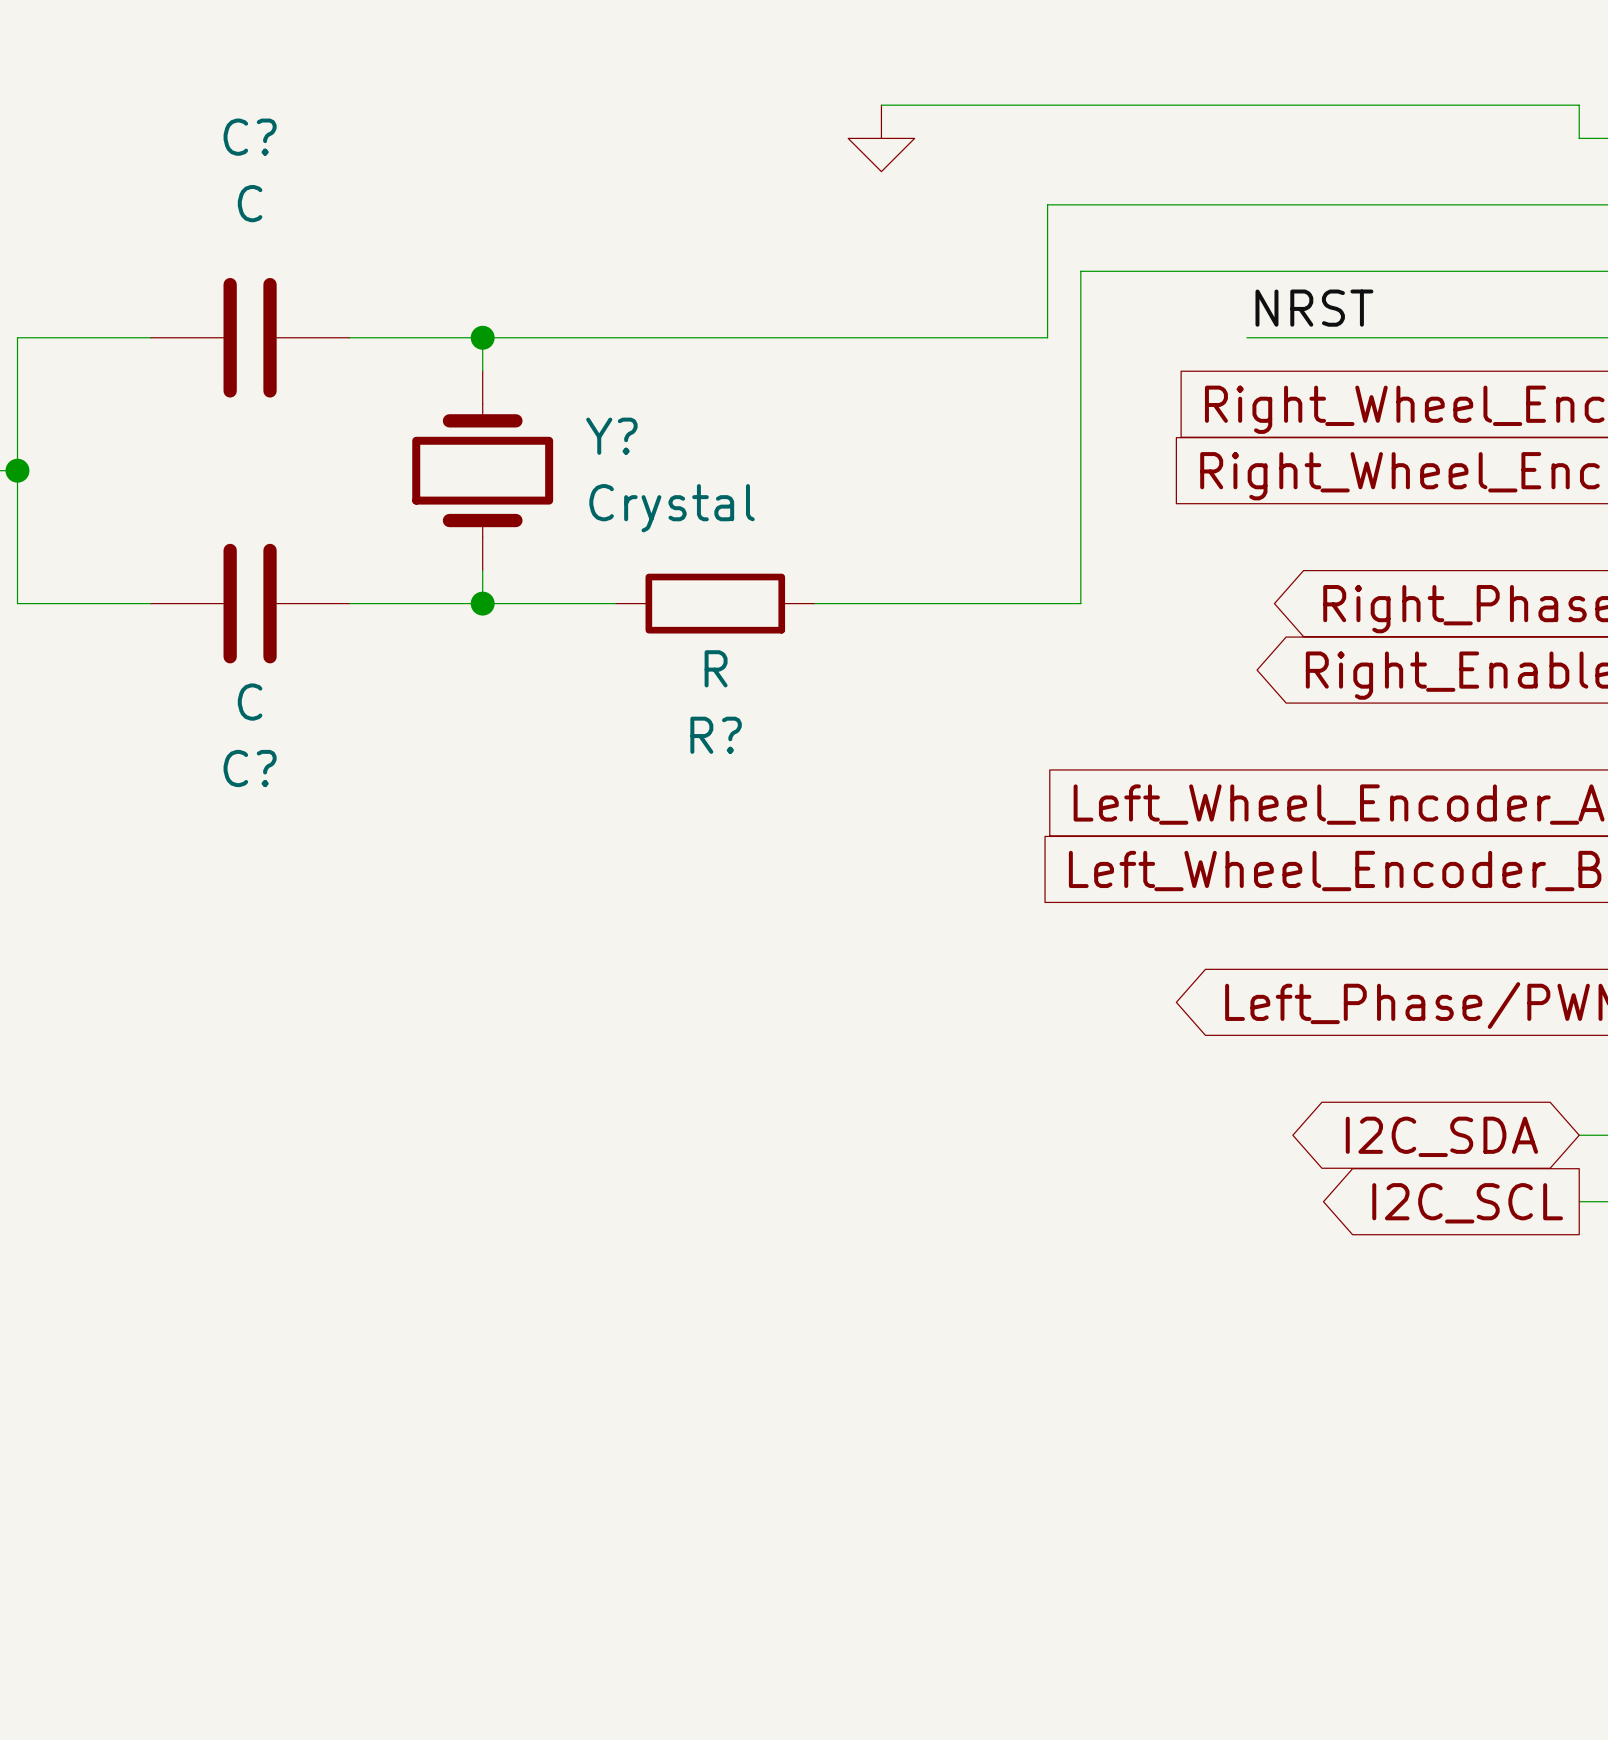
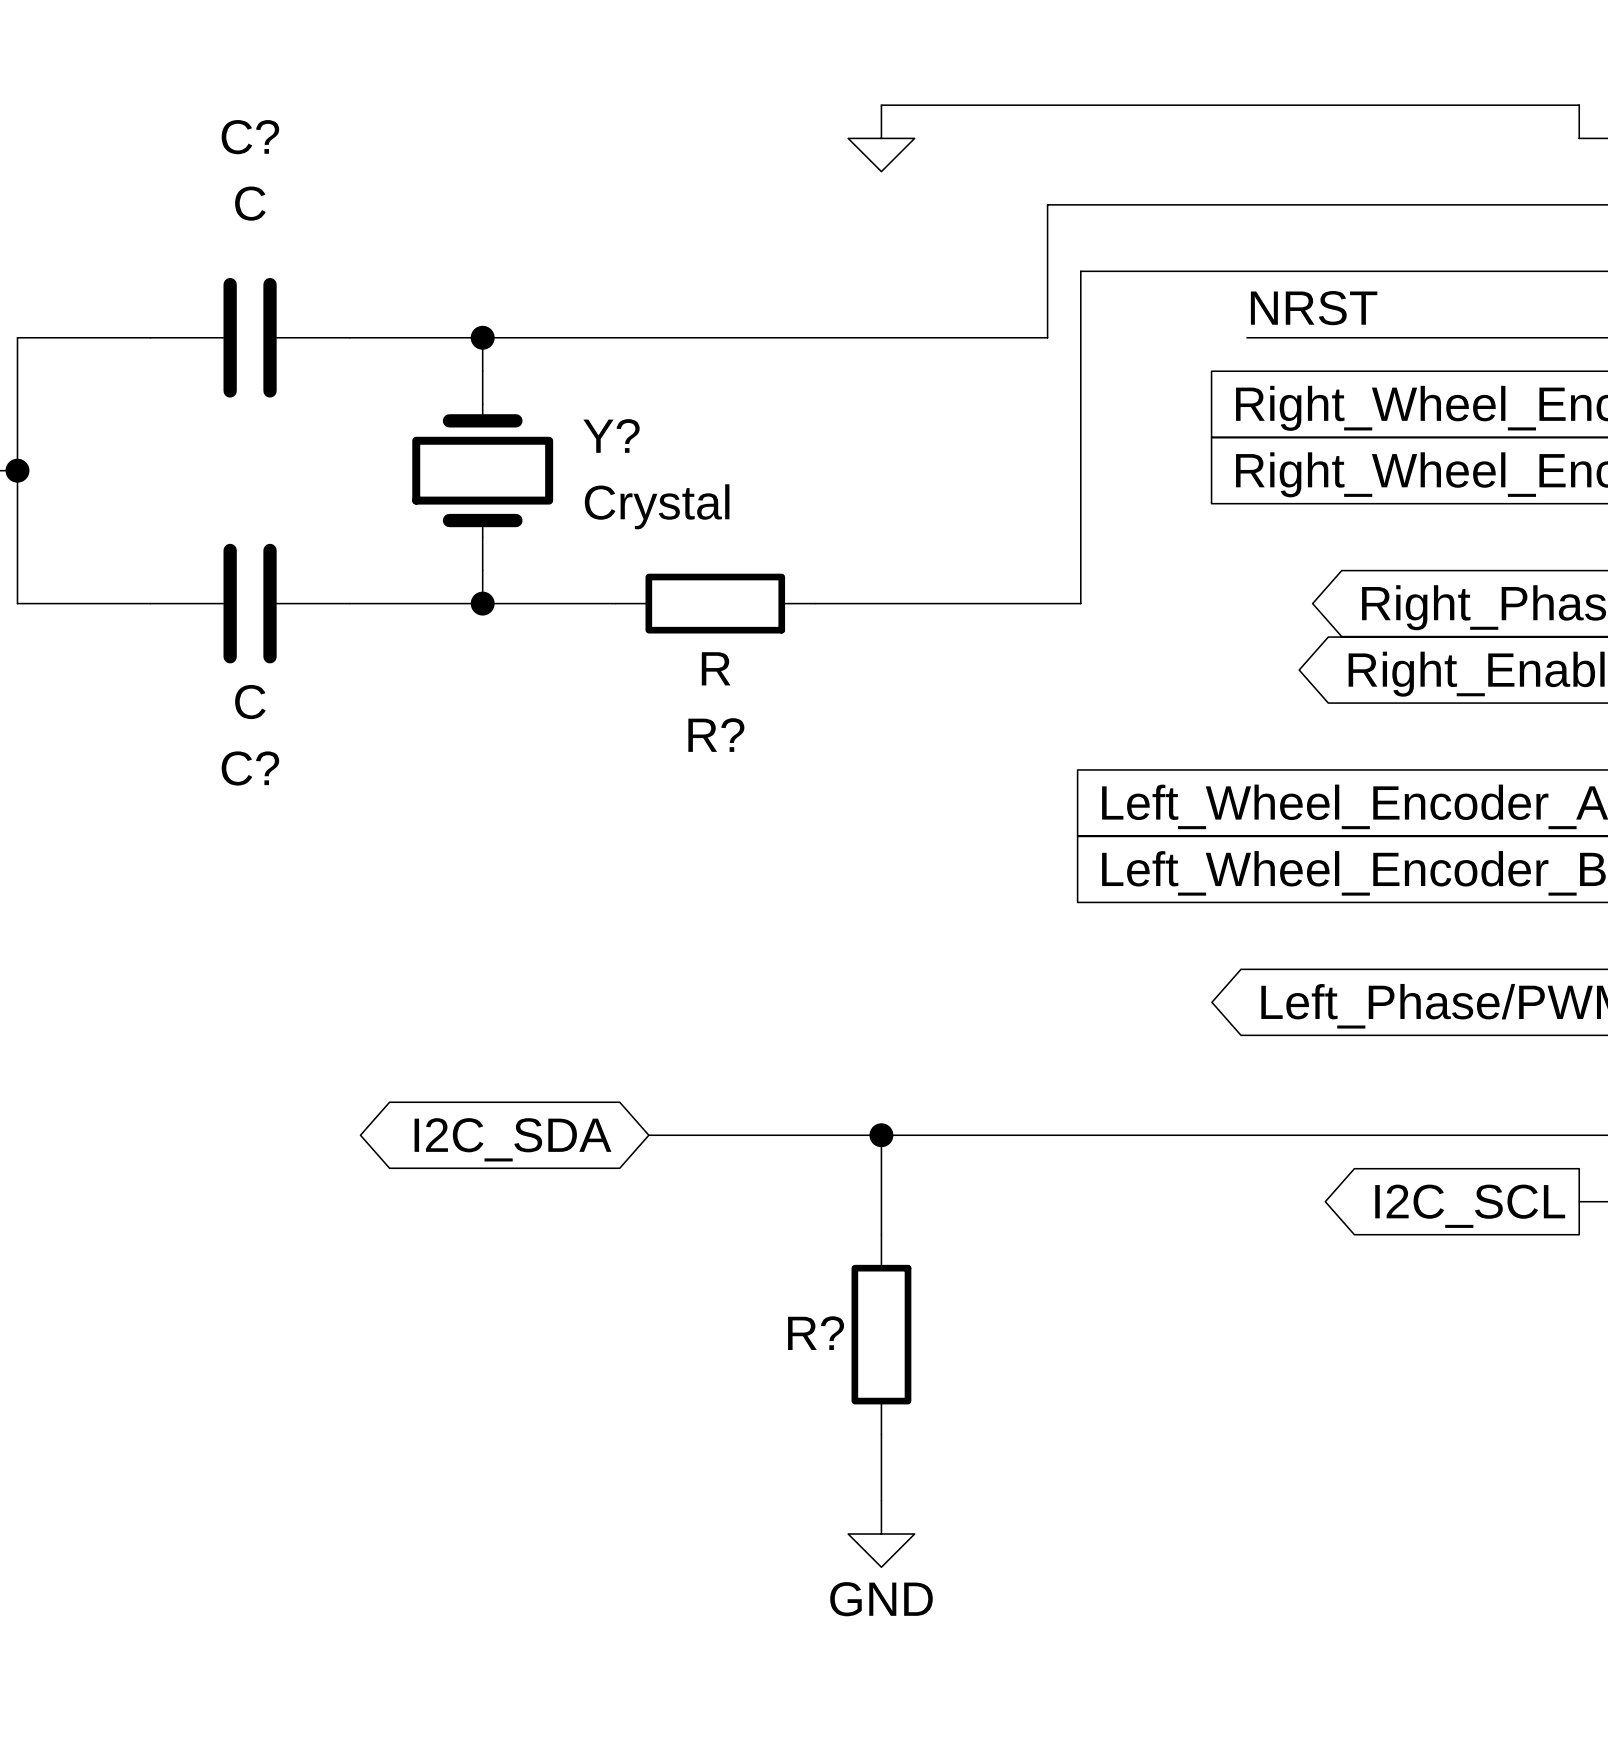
wire: none -> (648, 1135) (1579, 1135)
wire: none -> (881, 1135) (881, 1234)
junction: none -> (881, 1135)
global label: none -> I2C_SDA (512, 1139)
global label: I2C_SDA (1441, 1136) -> none
R?: none -> (881, 1334)
wire: none -> (881, 1434) (881, 1500)
power symbol: none -> GND (881, 1534)

